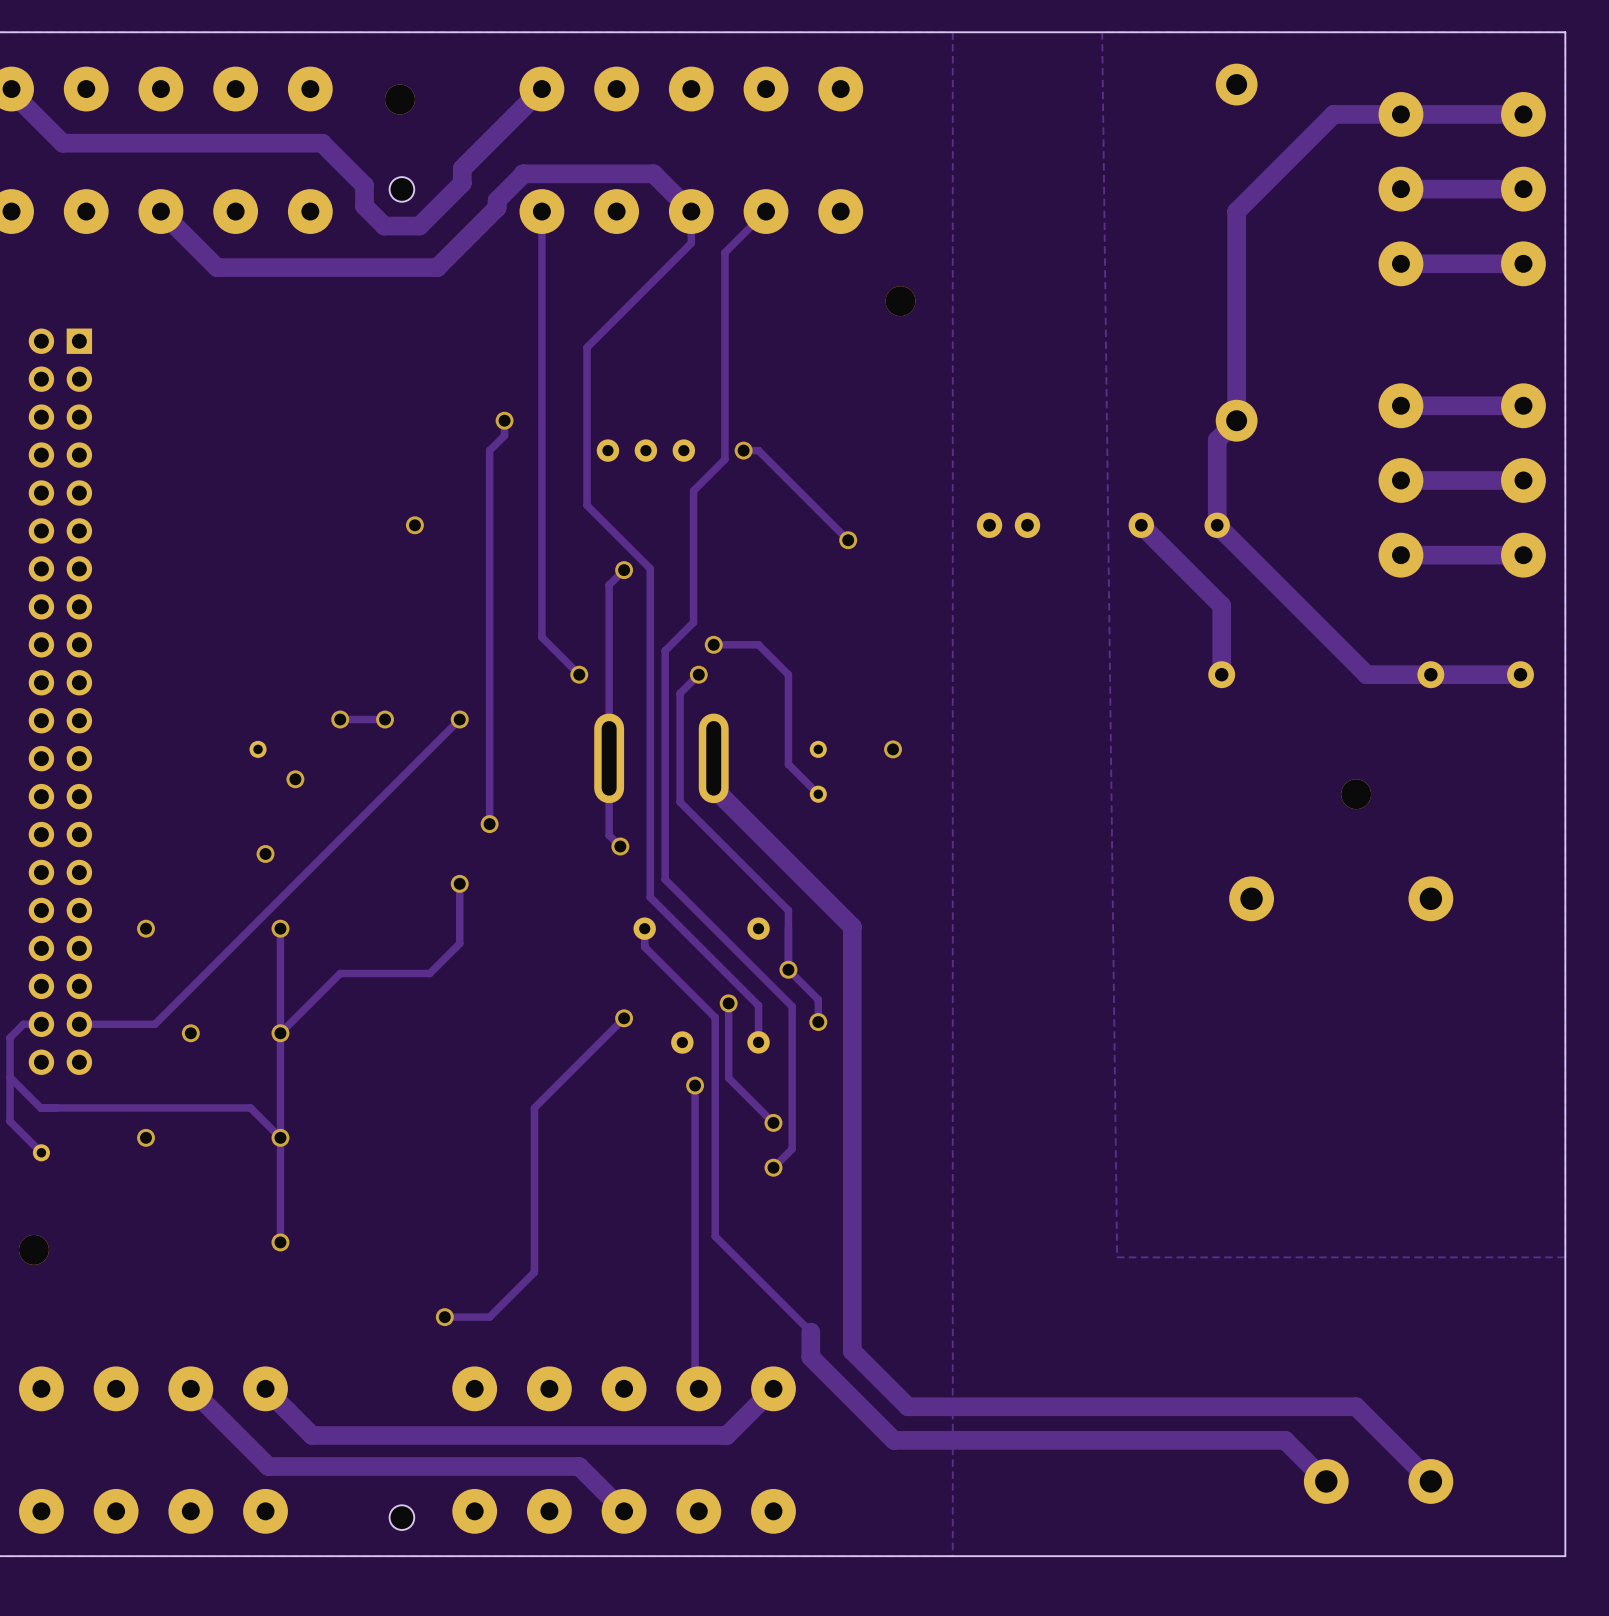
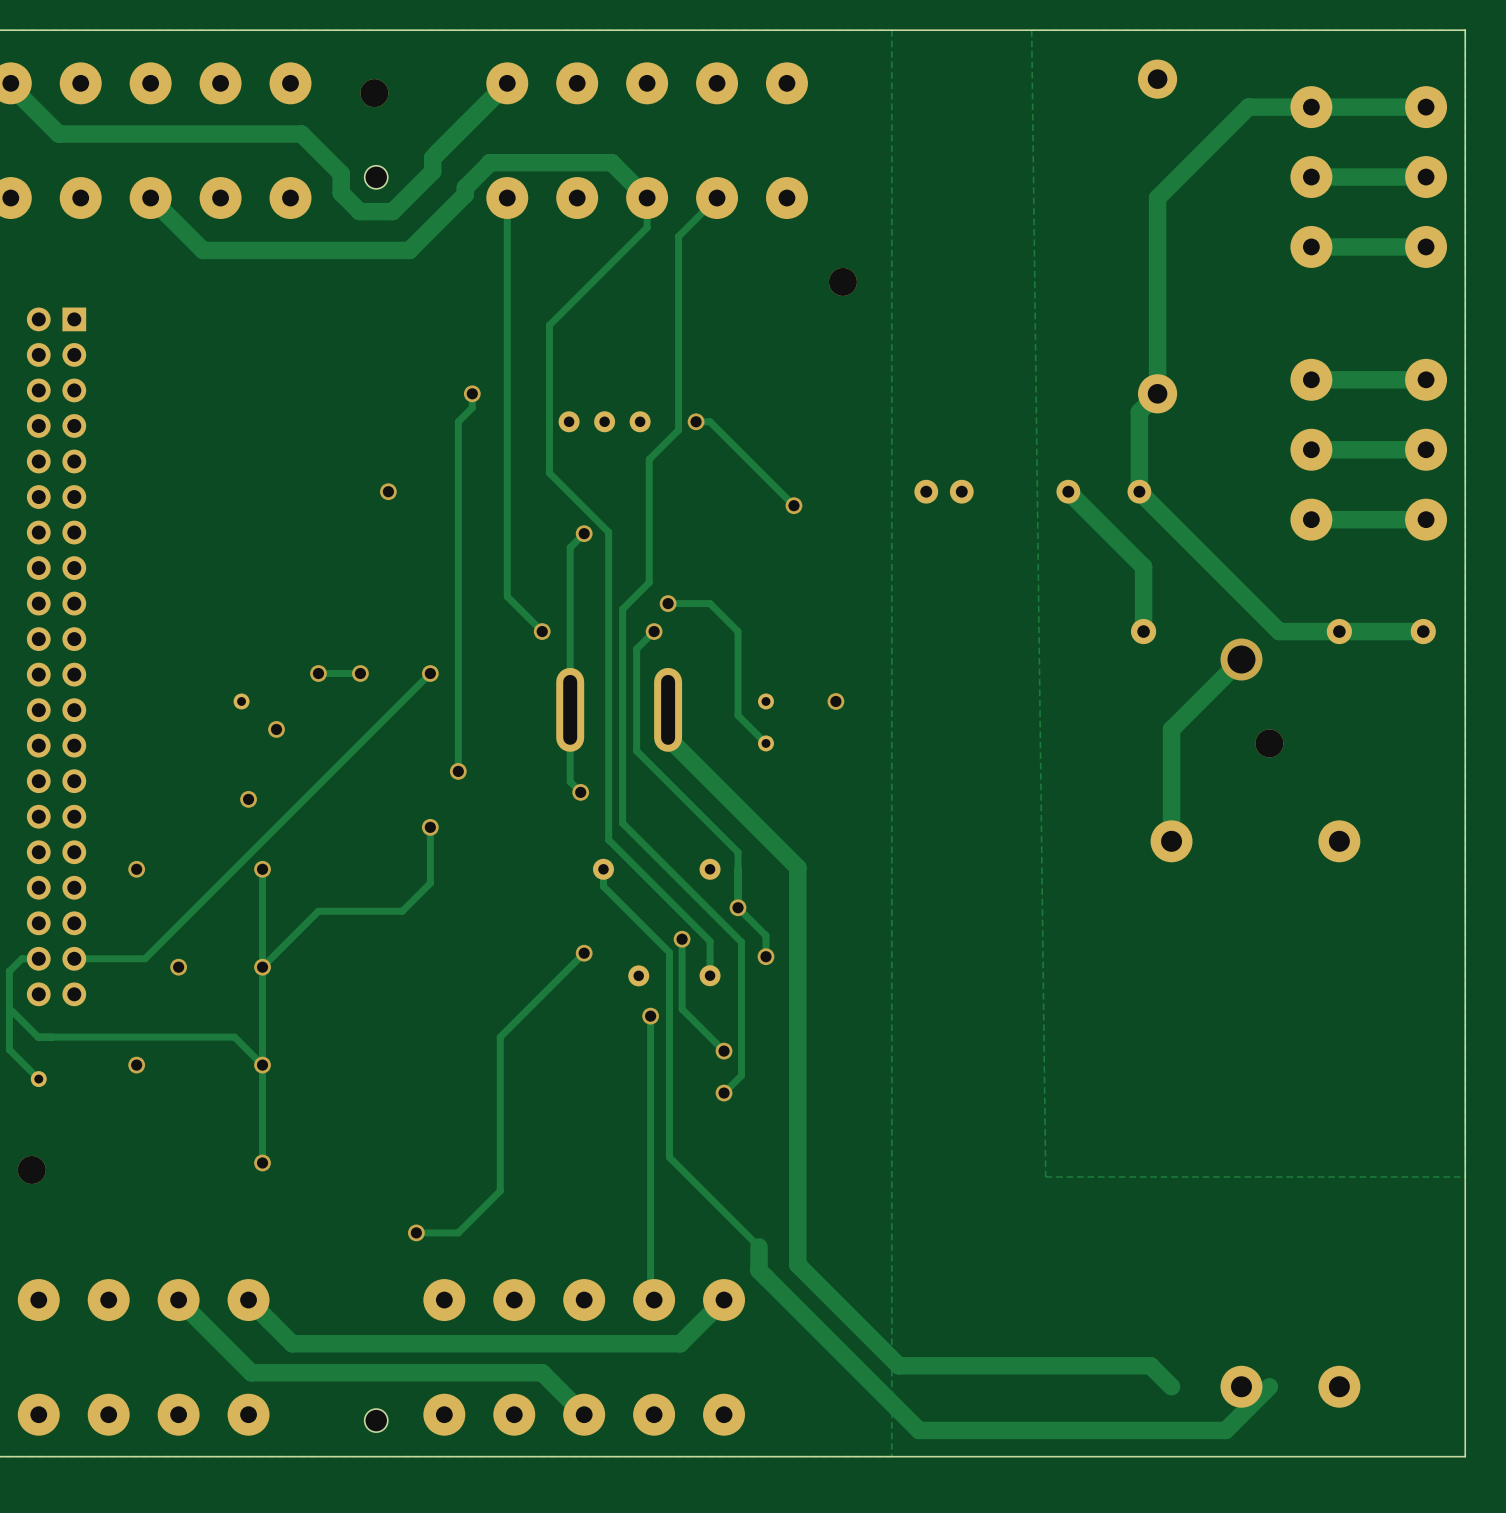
track: none -> (1241, 659) (1171, 729) (1171, 841)
via: none -> (1241, 659)
track: (907, 1406) (1356, 1406) (1430, 1481) -> (849, 1316) (898, 1365) (1150, 1365) (1171, 1386)
track: (894, 1440) (1285, 1440) (1326, 1481) -> (836, 1348) (919, 1430) (1225, 1430) (1269, 1386)

